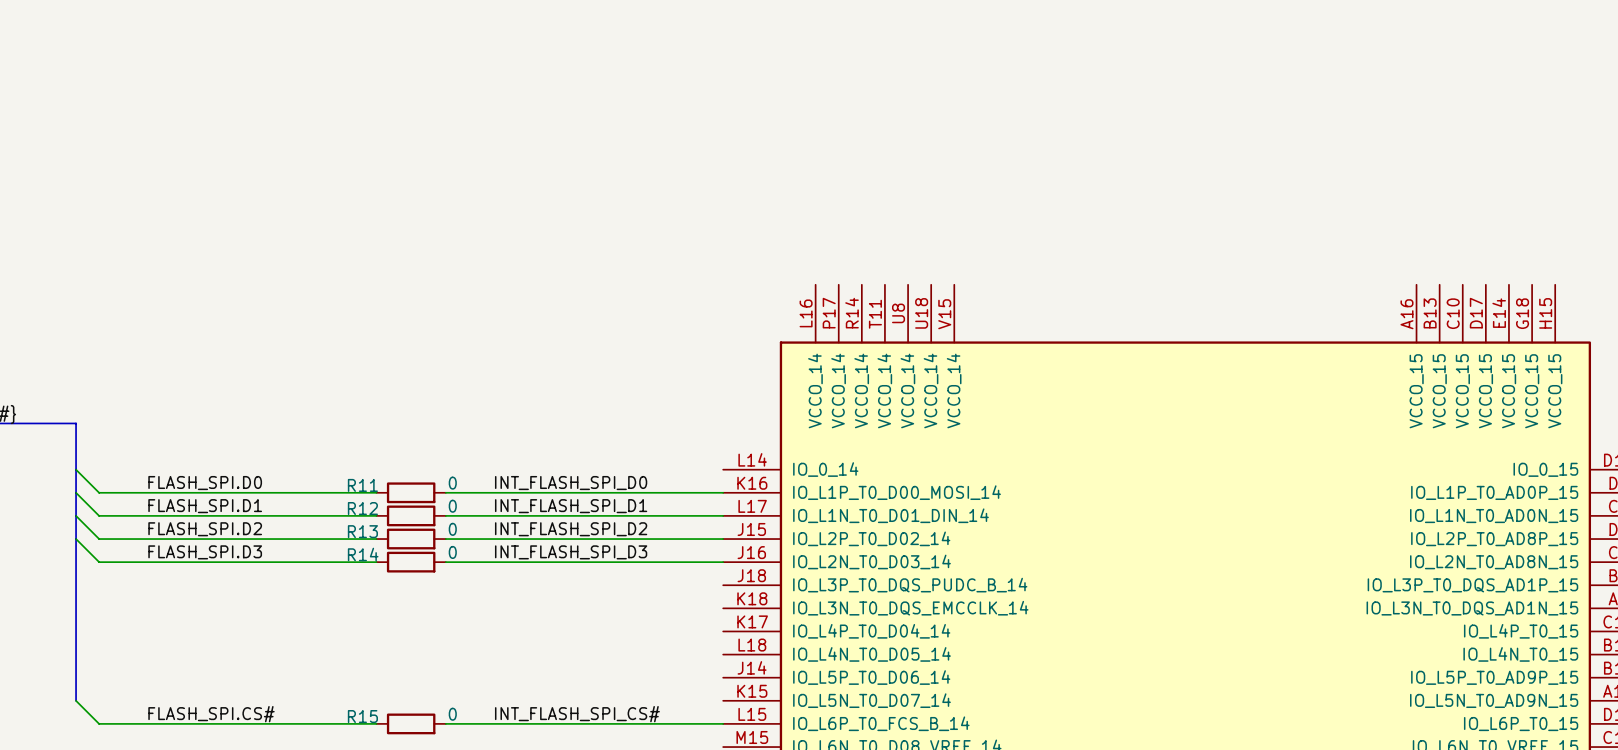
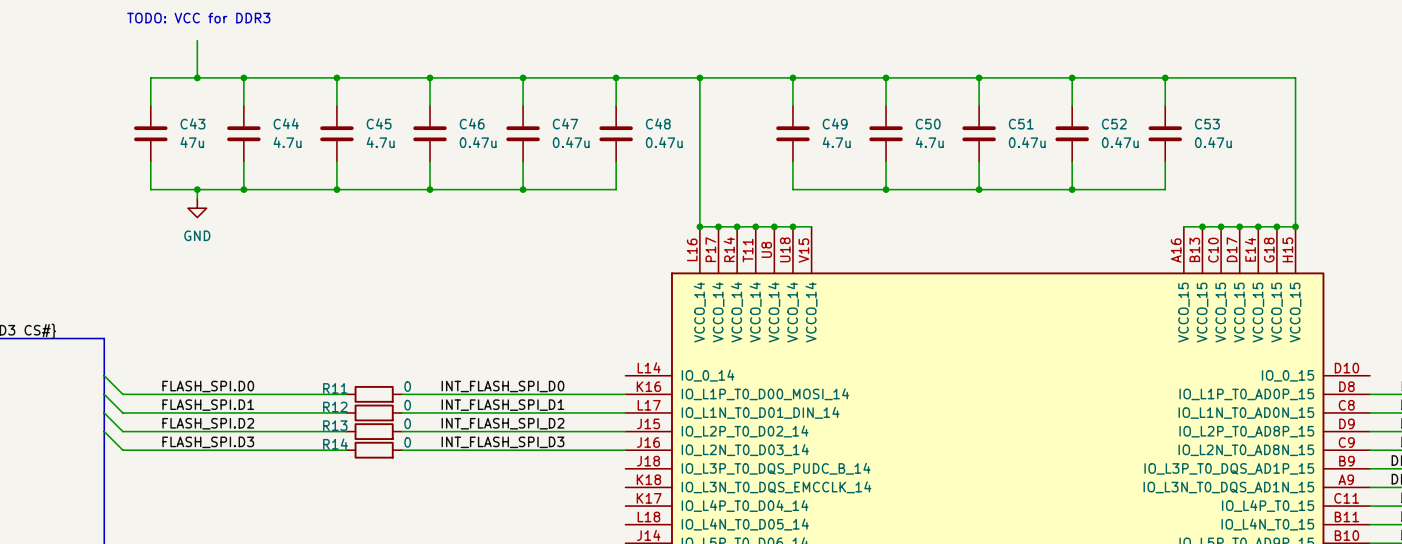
text: none -> TODO: VCC for DDR3 (198, 18)
wire: none -> (197, 40) (197, 77)
junction: none -> (197, 77)
wire: none -> (243, 77) (243, 105)
junction: none -> (243, 77)
wire: none -> (336, 77) (336, 105)
junction: none -> (336, 77)
wire: none -> (430, 77) (430, 105)
junction: none -> (430, 77)
wire: none -> (523, 77) (523, 105)
junction: none -> (523, 77)
wire: none -> (616, 77) (616, 105)
junction: none -> (616, 77)
wire: none -> (699, 77) (699, 226) (811, 226)
junction: none -> (699, 77)
wire: none -> (792, 77) (792, 105)
junction: none -> (792, 77)
wire: none -> (886, 77) (886, 105)
junction: none -> (886, 77)
wire: none -> (979, 77) (979, 105)
junction: none -> (979, 77)
wire: none -> (1072, 77) (1072, 105)
junction: none -> (1072, 77)
wire: none -> (1165, 77) (1165, 105)
junction: none -> (1165, 77)
wire: none -> (150, 105) (150, 77) (1295, 77) (1295, 226) (1183, 226)
C43: none -> 47u (150, 133)
C44: none -> 4.7u (243, 133)
C45: none -> 4.7u (336, 133)
C46: none -> 0.47u (430, 133)
C47: none -> 0.47u (523, 133)
C48: none -> 0.47u (616, 133)
C49: none -> 4.7u (792, 133)
C50: none -> 4.7u (886, 133)
C51: none -> 0.47u (979, 133)
C52: none -> 0.47u (1072, 133)
C53: none -> 0.47u (1165, 133)
wire: none -> (150, 161) (150, 189) (616, 189) (616, 161)
wire: none -> (243, 161) (243, 189)
wire: none -> (336, 161) (336, 189)
wire: none -> (430, 161) (430, 189)
wire: none -> (523, 161) (523, 189)
wire: none -> (792, 161) (792, 189) (1165, 189) (1165, 161)
wire: none -> (886, 161) (886, 189)
wire: none -> (979, 161) (979, 189)
wire: none -> (1072, 161) (1072, 189)
wire: none -> (197, 189) (197, 198)
junction: none -> (197, 189)
junction: none -> (243, 189)
junction: none -> (336, 189)
junction: none -> (430, 189)
junction: none -> (523, 189)
junction: none -> (886, 189)
junction: none -> (979, 189)
junction: none -> (1072, 189)
power symbol: none -> GND (197, 208)
junction: none -> (699, 226)
junction: none -> (718, 226)
junction: none -> (737, 226)
junction: none -> (755, 226)
junction: none -> (774, 226)
junction: none -> (792, 226)
junction: none -> (1202, 226)
junction: none -> (1221, 226)
junction: none -> (1239, 226)
junction: none -> (1258, 226)
junction: none -> (1276, 226)
junction: none -> (1295, 226)

